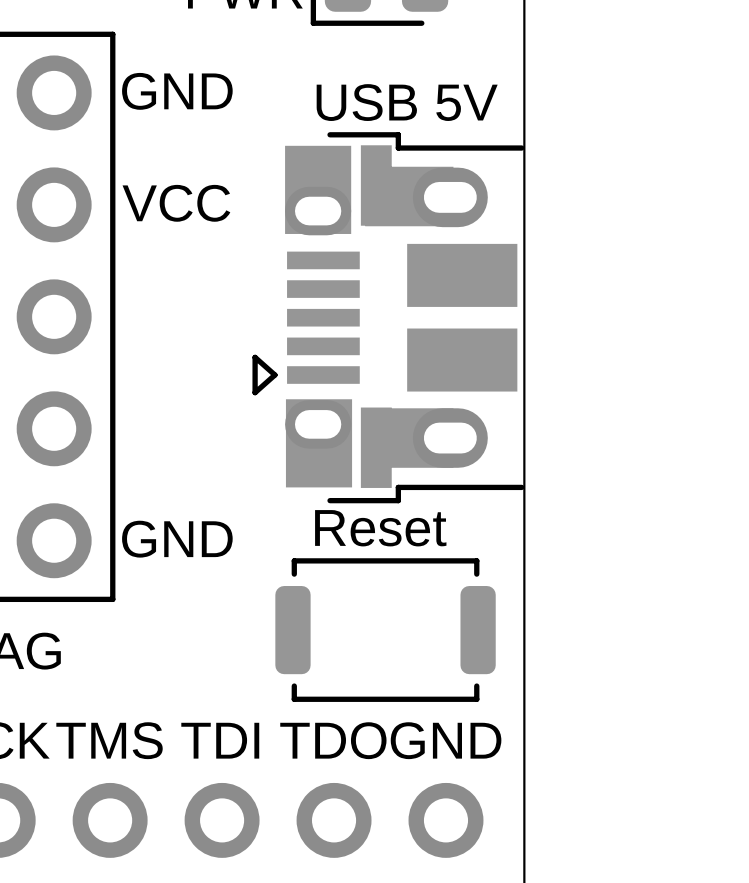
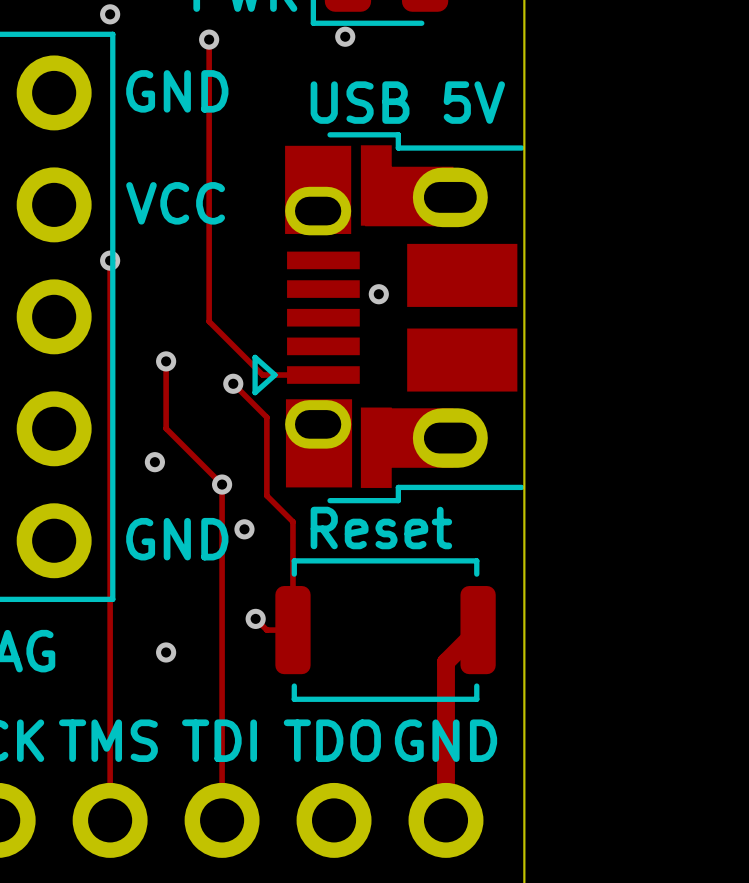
via: none -> (110, 14)
via: none -> (345, 36)
track: none -> (209, 39) (209, 321) (262, 375) (323, 375)
via: none -> (209, 39)
track: none -> (110, 260) (110, 820)
via: none -> (110, 260)
via: none -> (378, 294)
track: none -> (166, 361) (166, 428) (222, 484) (222, 820)
via: none -> (166, 361)
track: none -> (233, 383) (266, 417) (266, 495) (292, 521) (292, 630) (266, 630) (255, 618)
via: none -> (233, 383)
via: none -> (154, 462)
via: none -> (222, 484)
via: none -> (244, 529)
via: none -> (255, 618)
track: none -> (478, 630) (445, 662) (445, 820)
via: none -> (166, 652)

